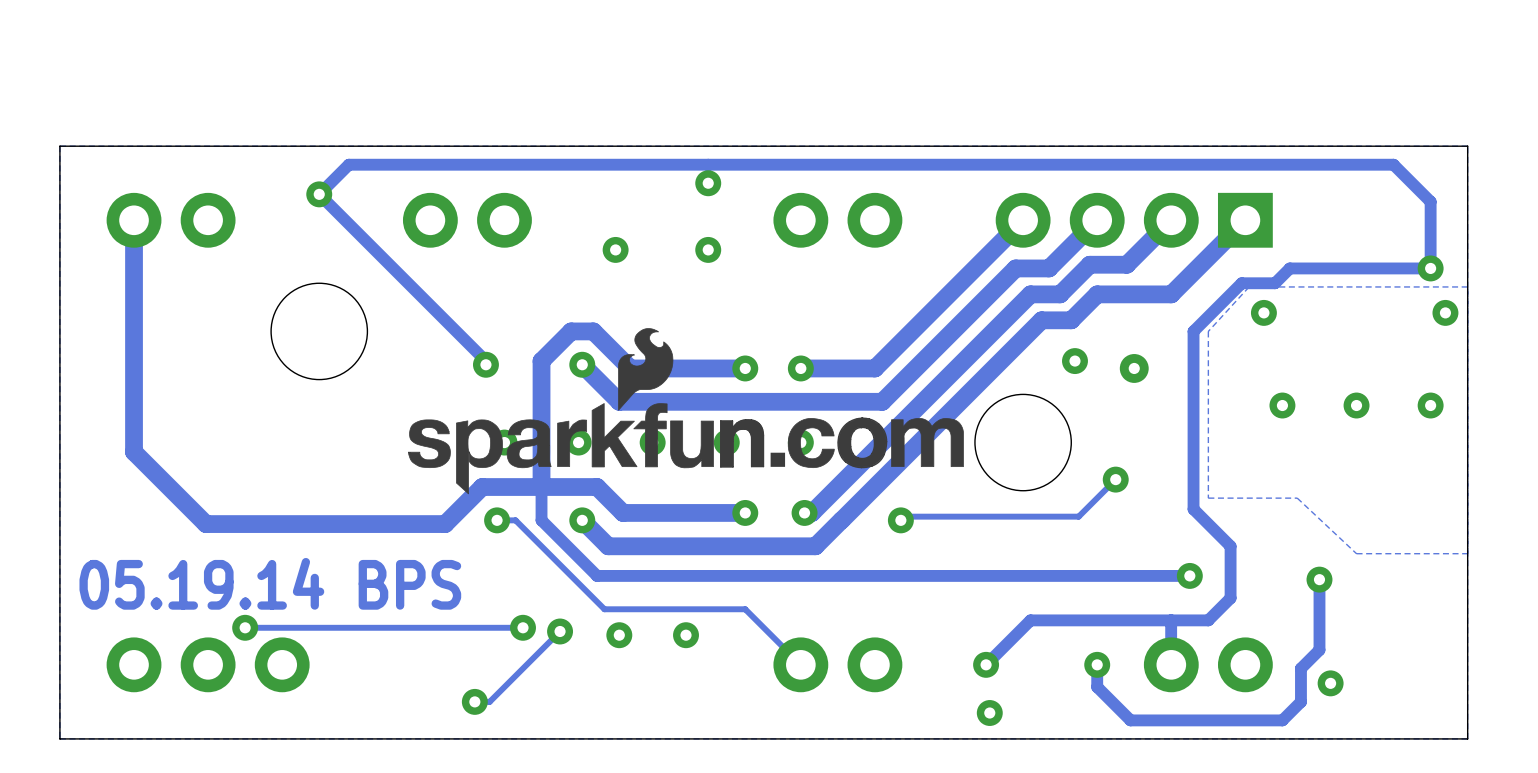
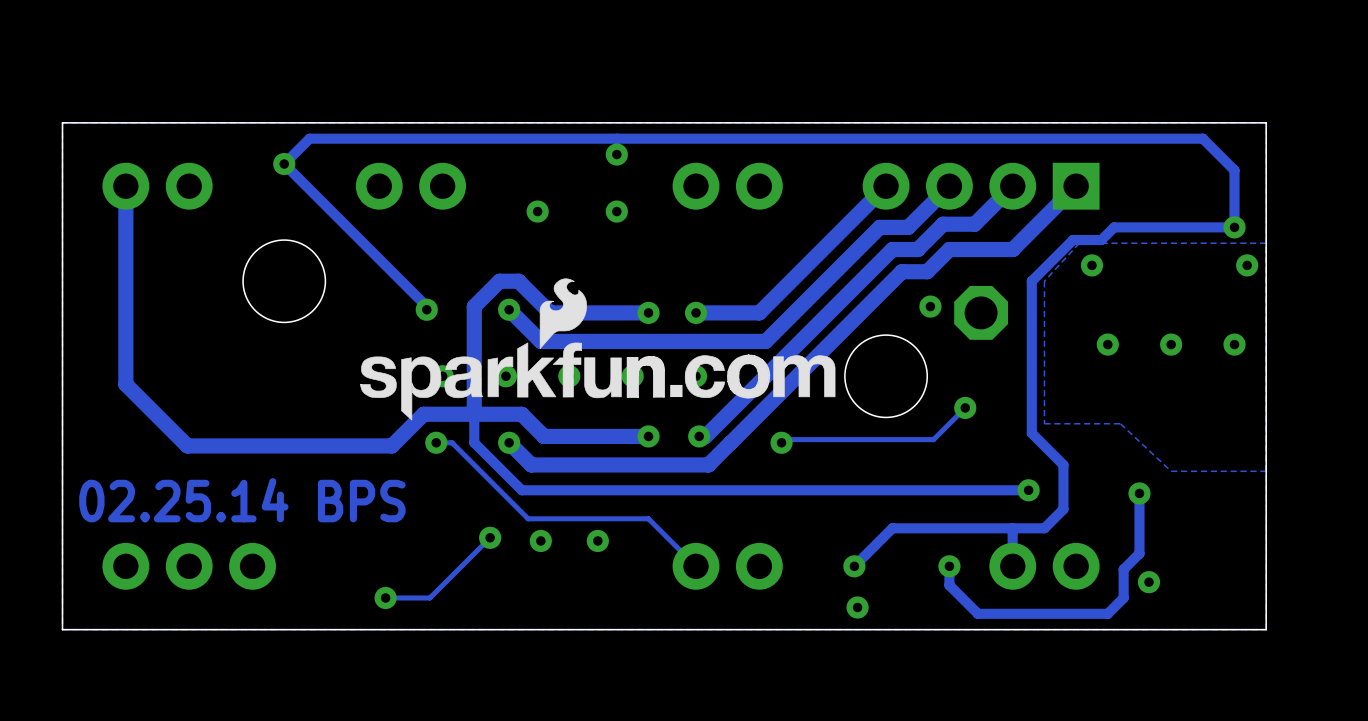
part footprint: [1119, 354, 1149, 383] -> [954, 285, 1009, 340]
text: 05.19.14 BPS (270, 583) -> 02.25.14 BPS (242, 500)
via: (245, 627) -> none
track: (523, 627) (245, 627) -> none
via: (523, 627) -> none
track: none -> (417, 597) (385, 597)
via position: (474, 701) -> (385, 597)

